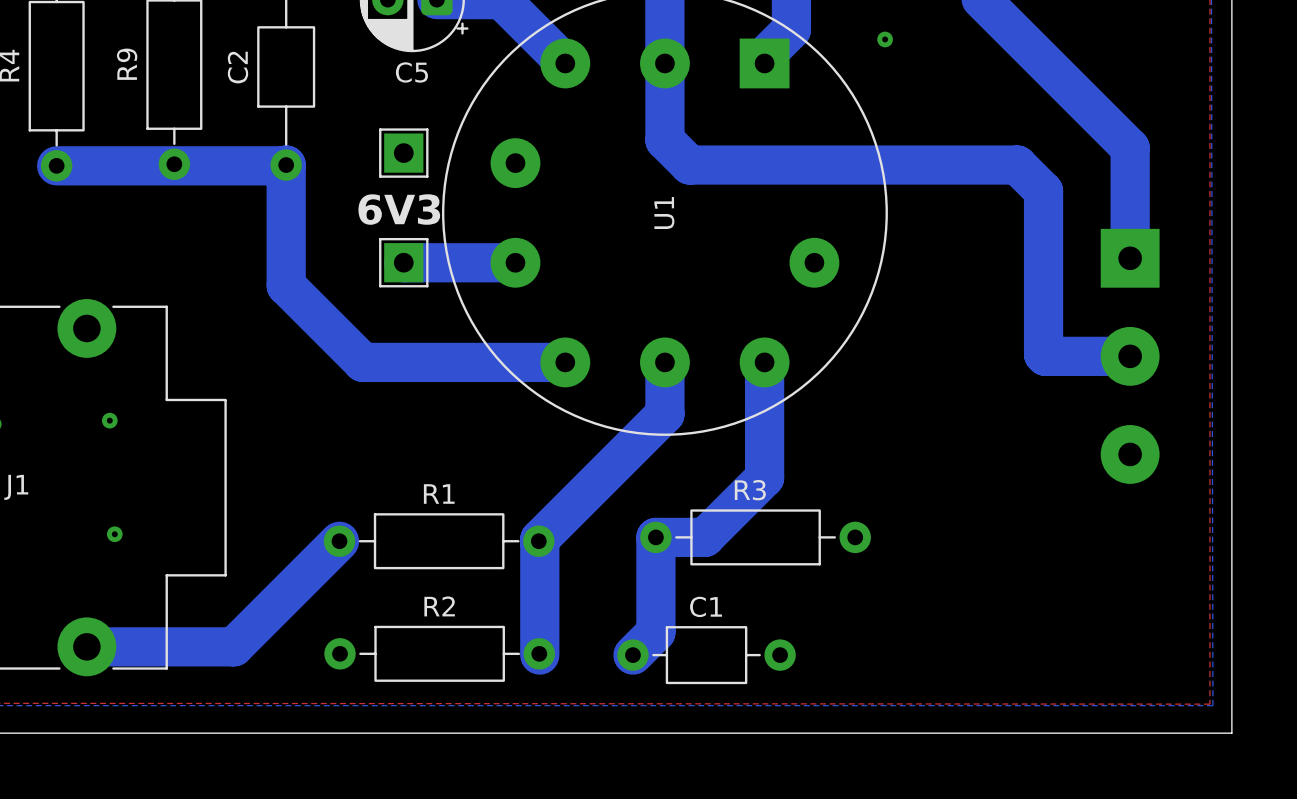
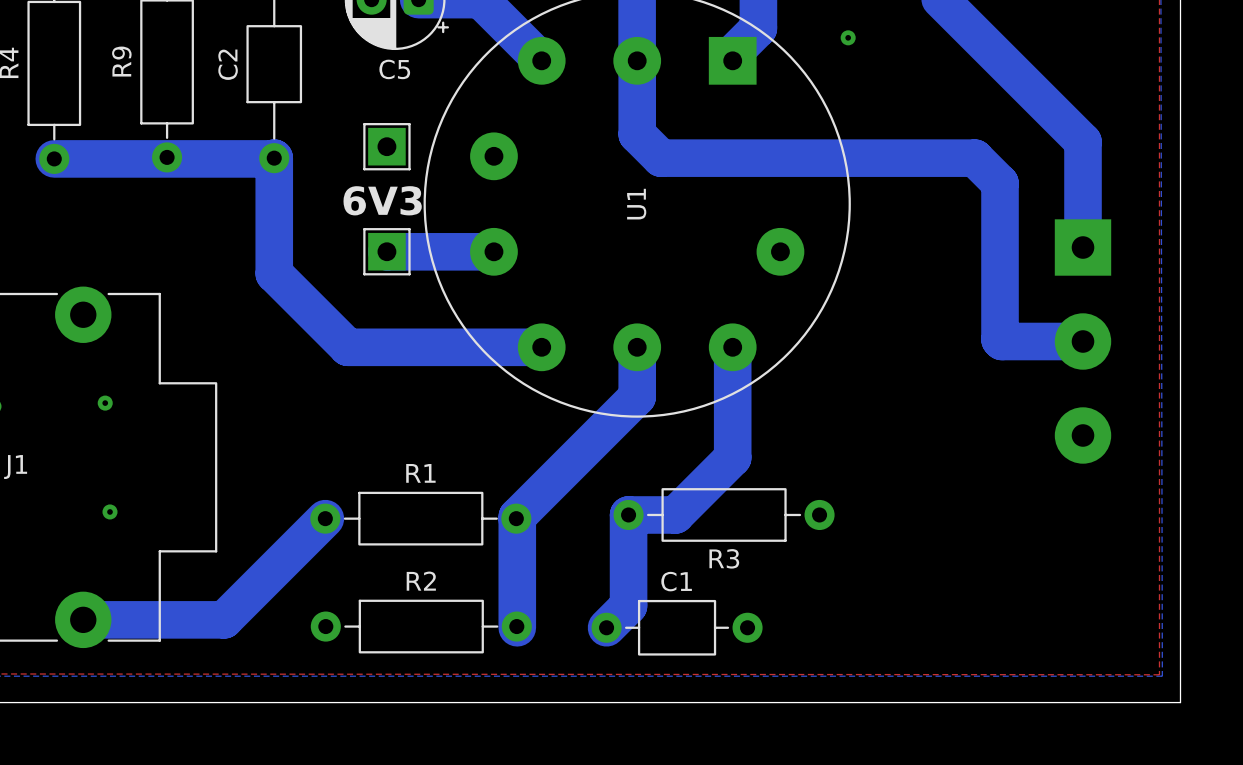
R3 name position: R3 (750, 490) -> R3 (724, 558)

